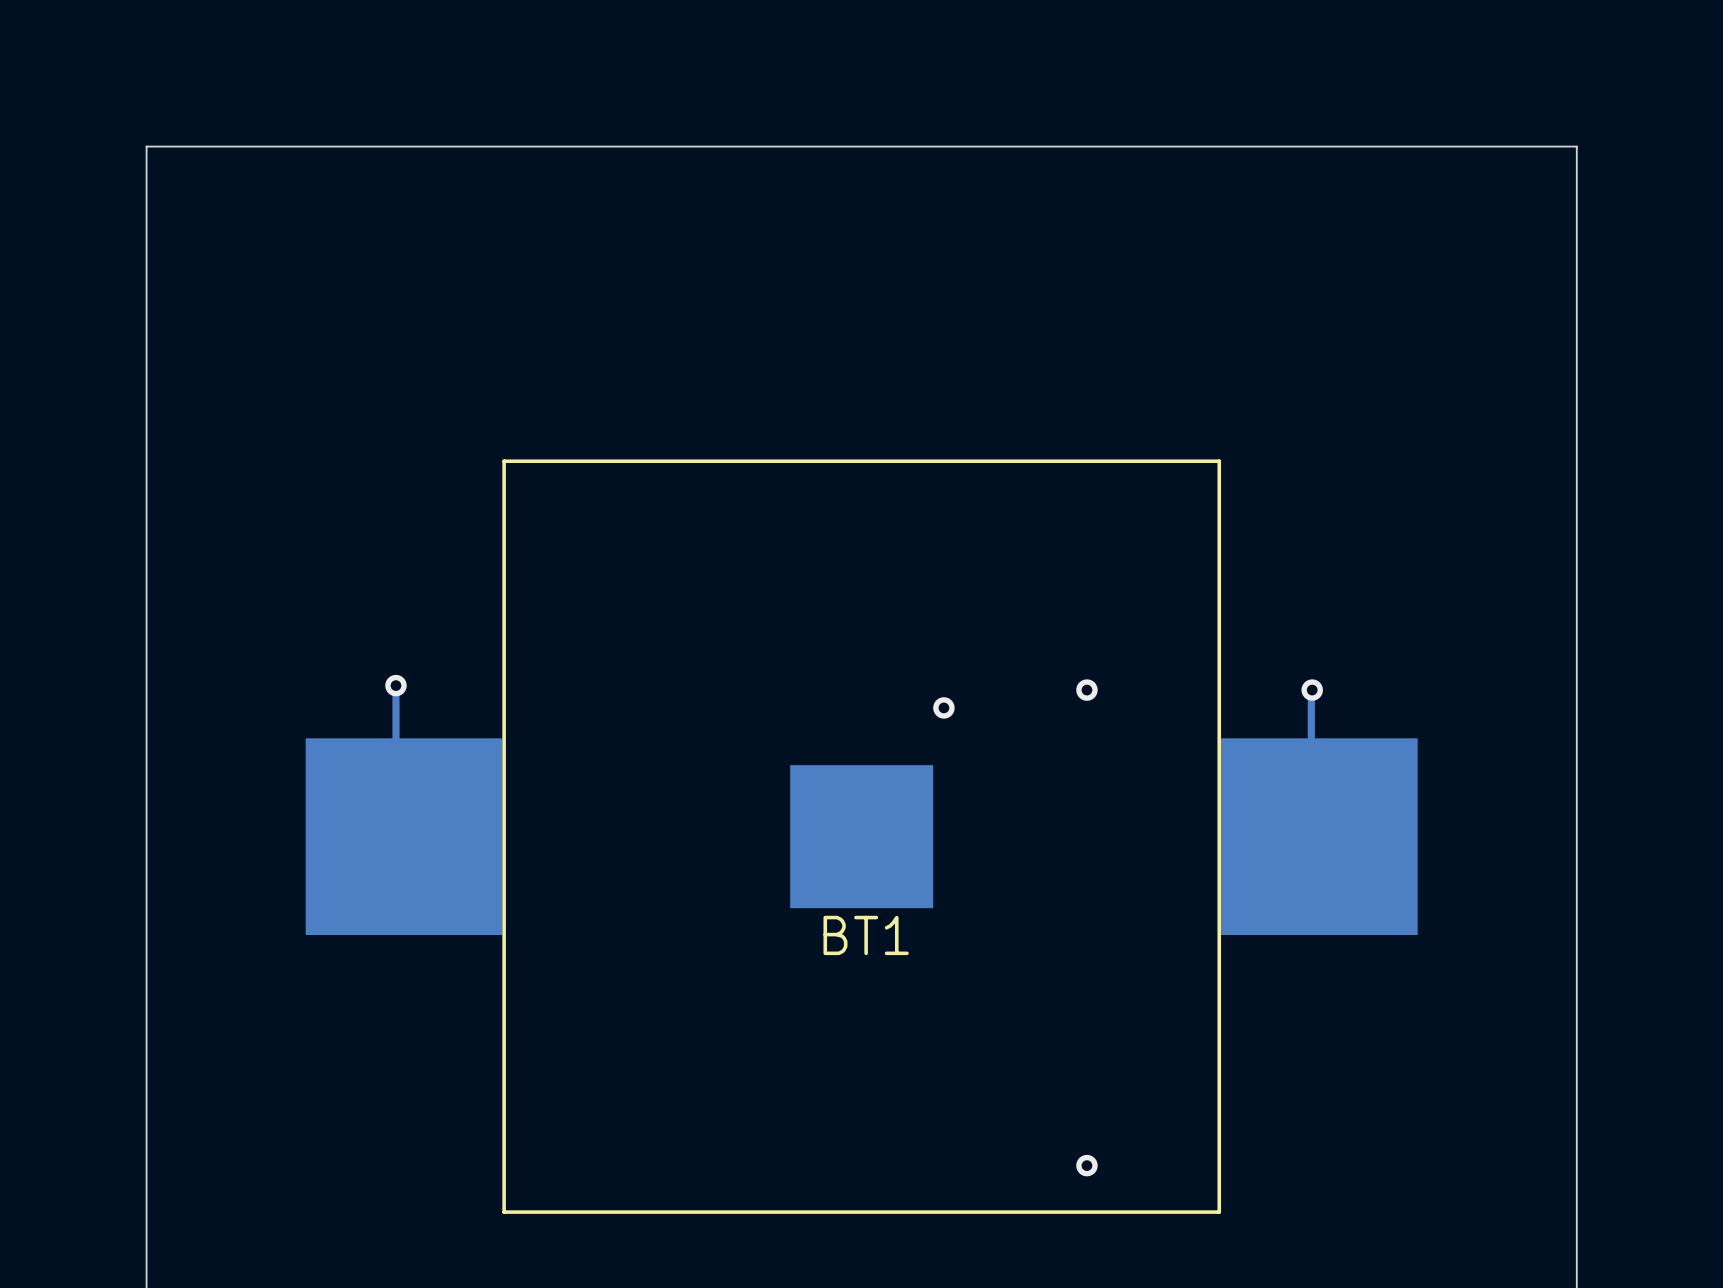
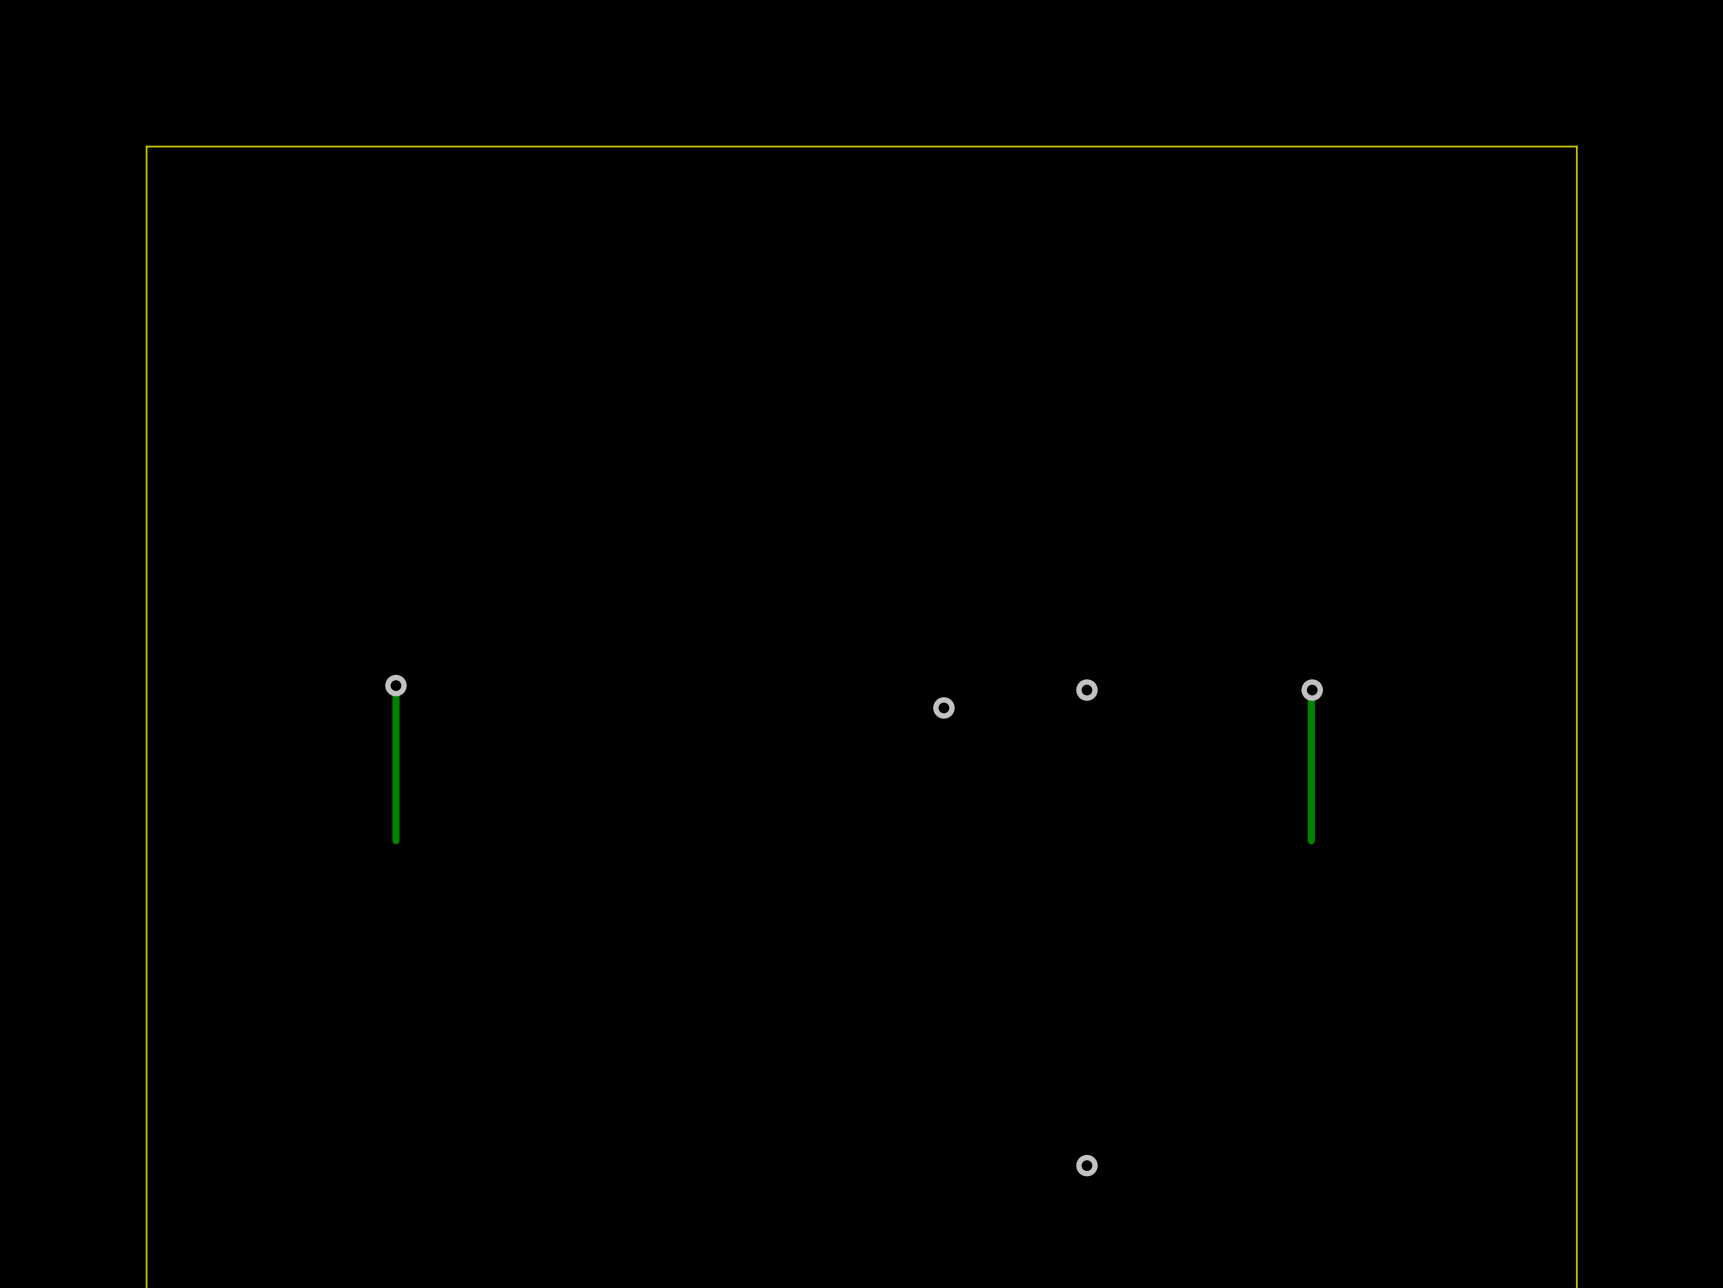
BT1: (861, 836) -> none

